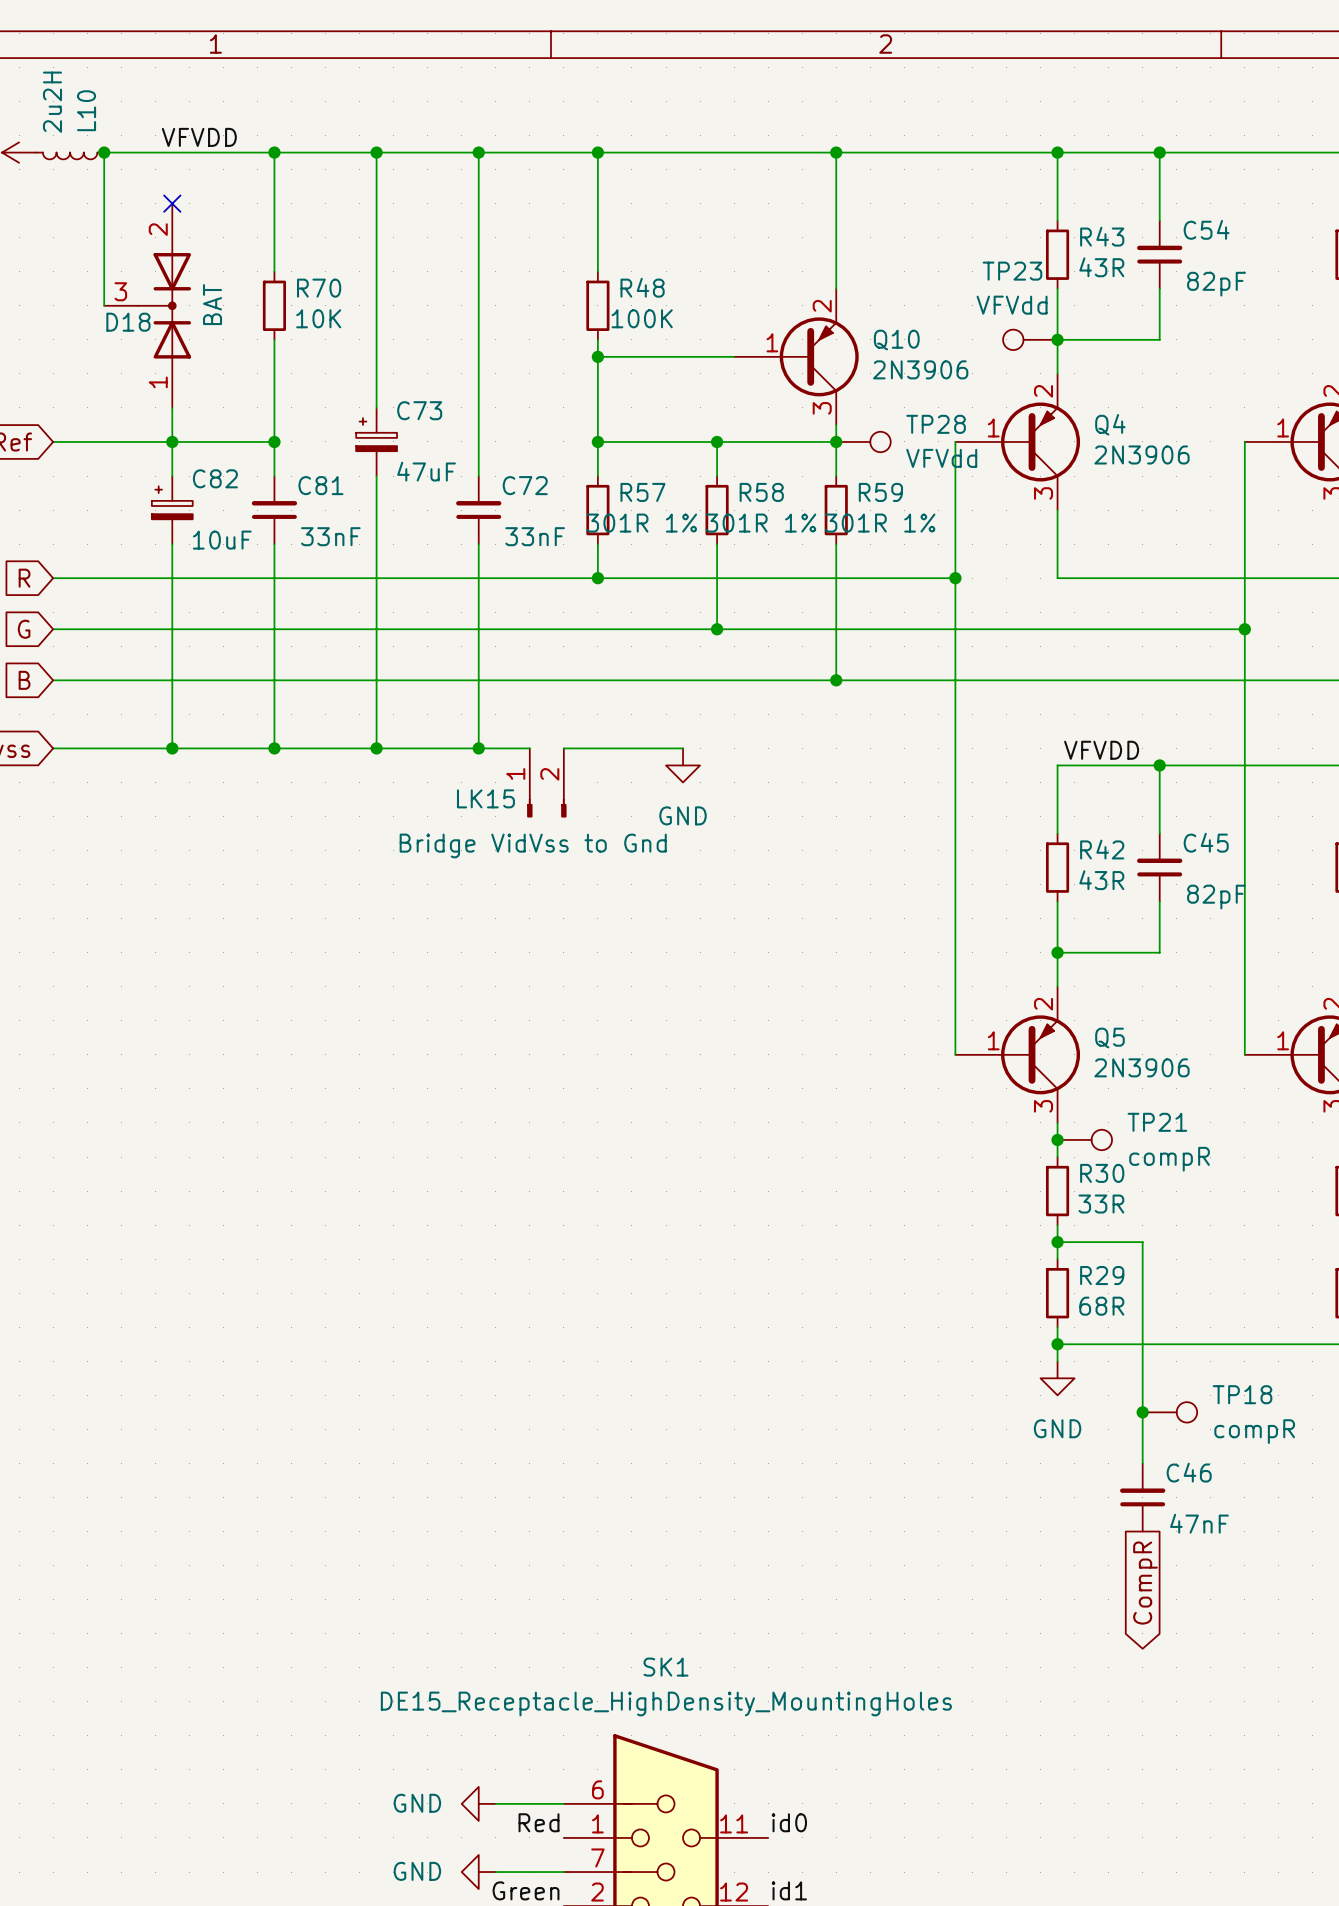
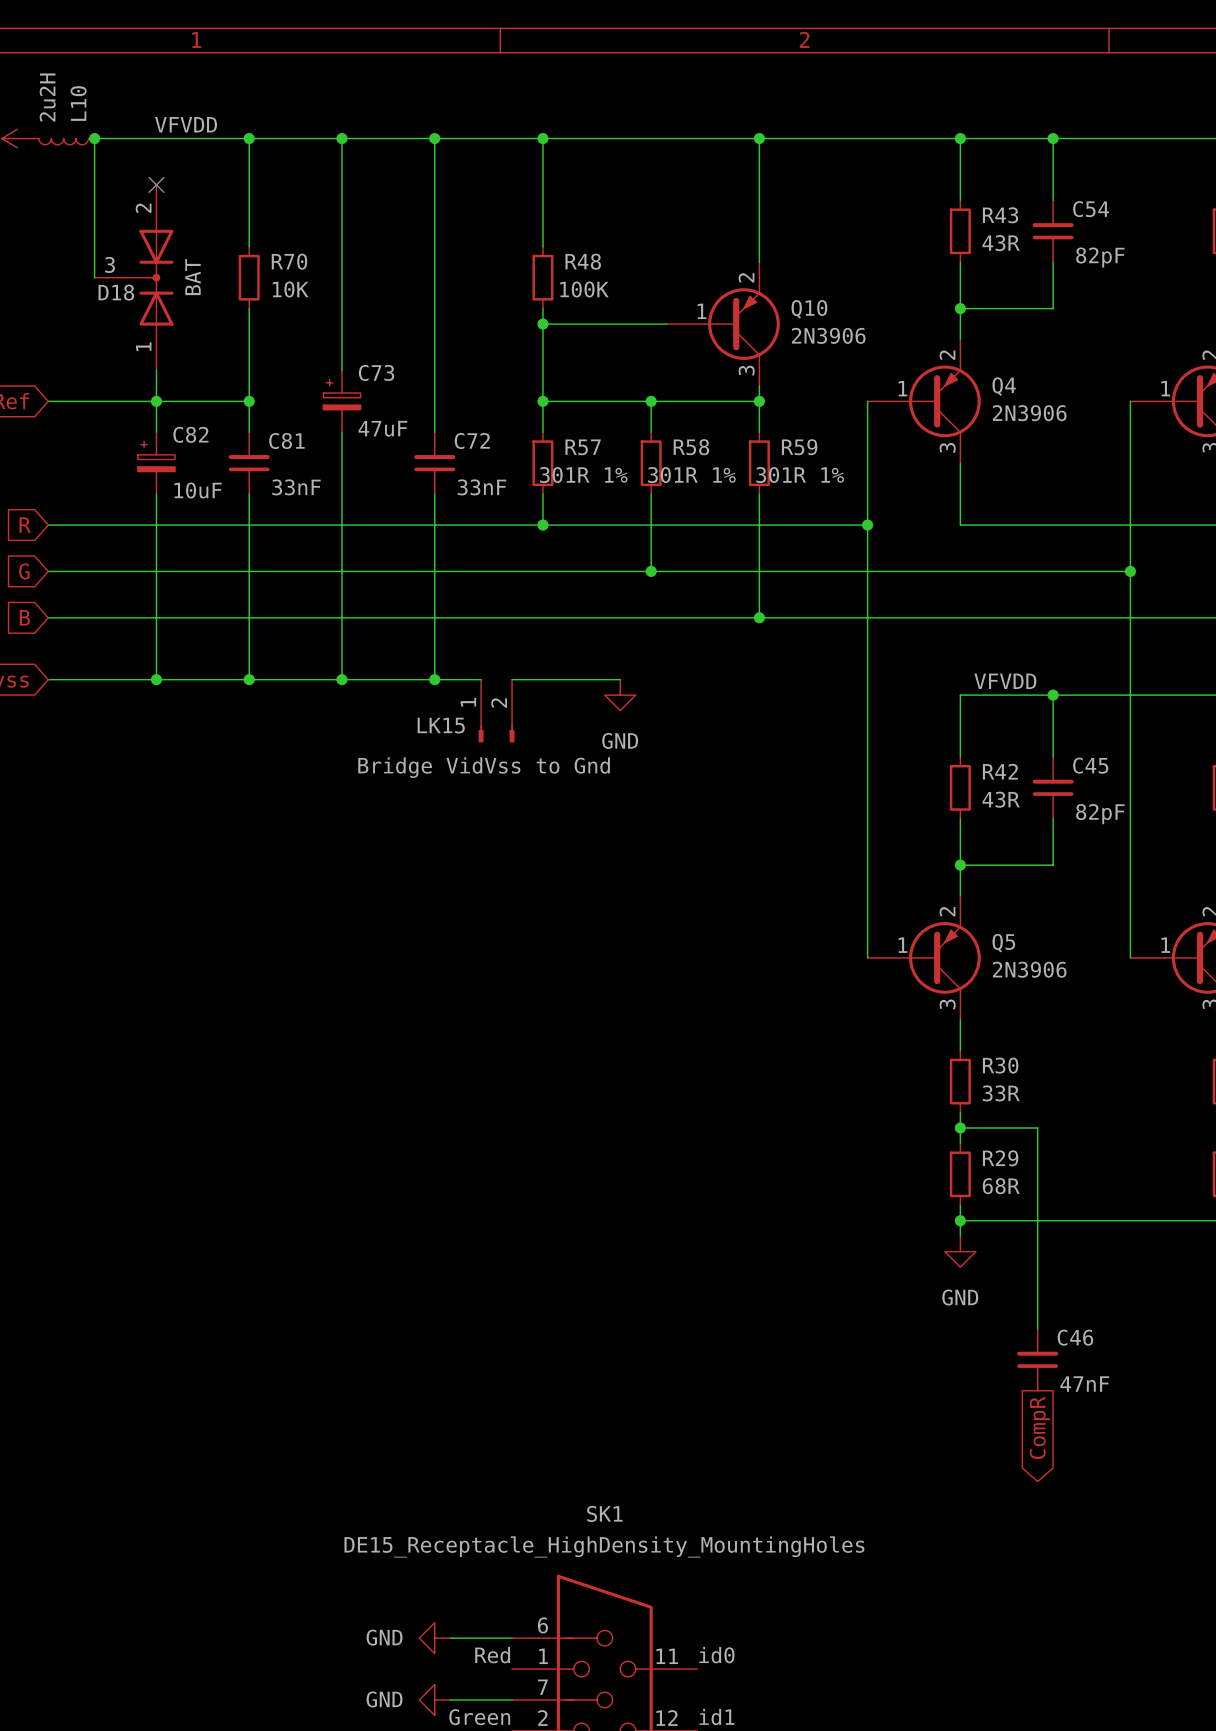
TP23: VFVdd (1030, 339) -> none
TP28: VFVdd (863, 441) -> none
junction: (1057, 1139) -> none
TP21: compR (1084, 1139) -> none
junction: (1142, 1412) -> none
TP18: compR (1169, 1412) -> none

